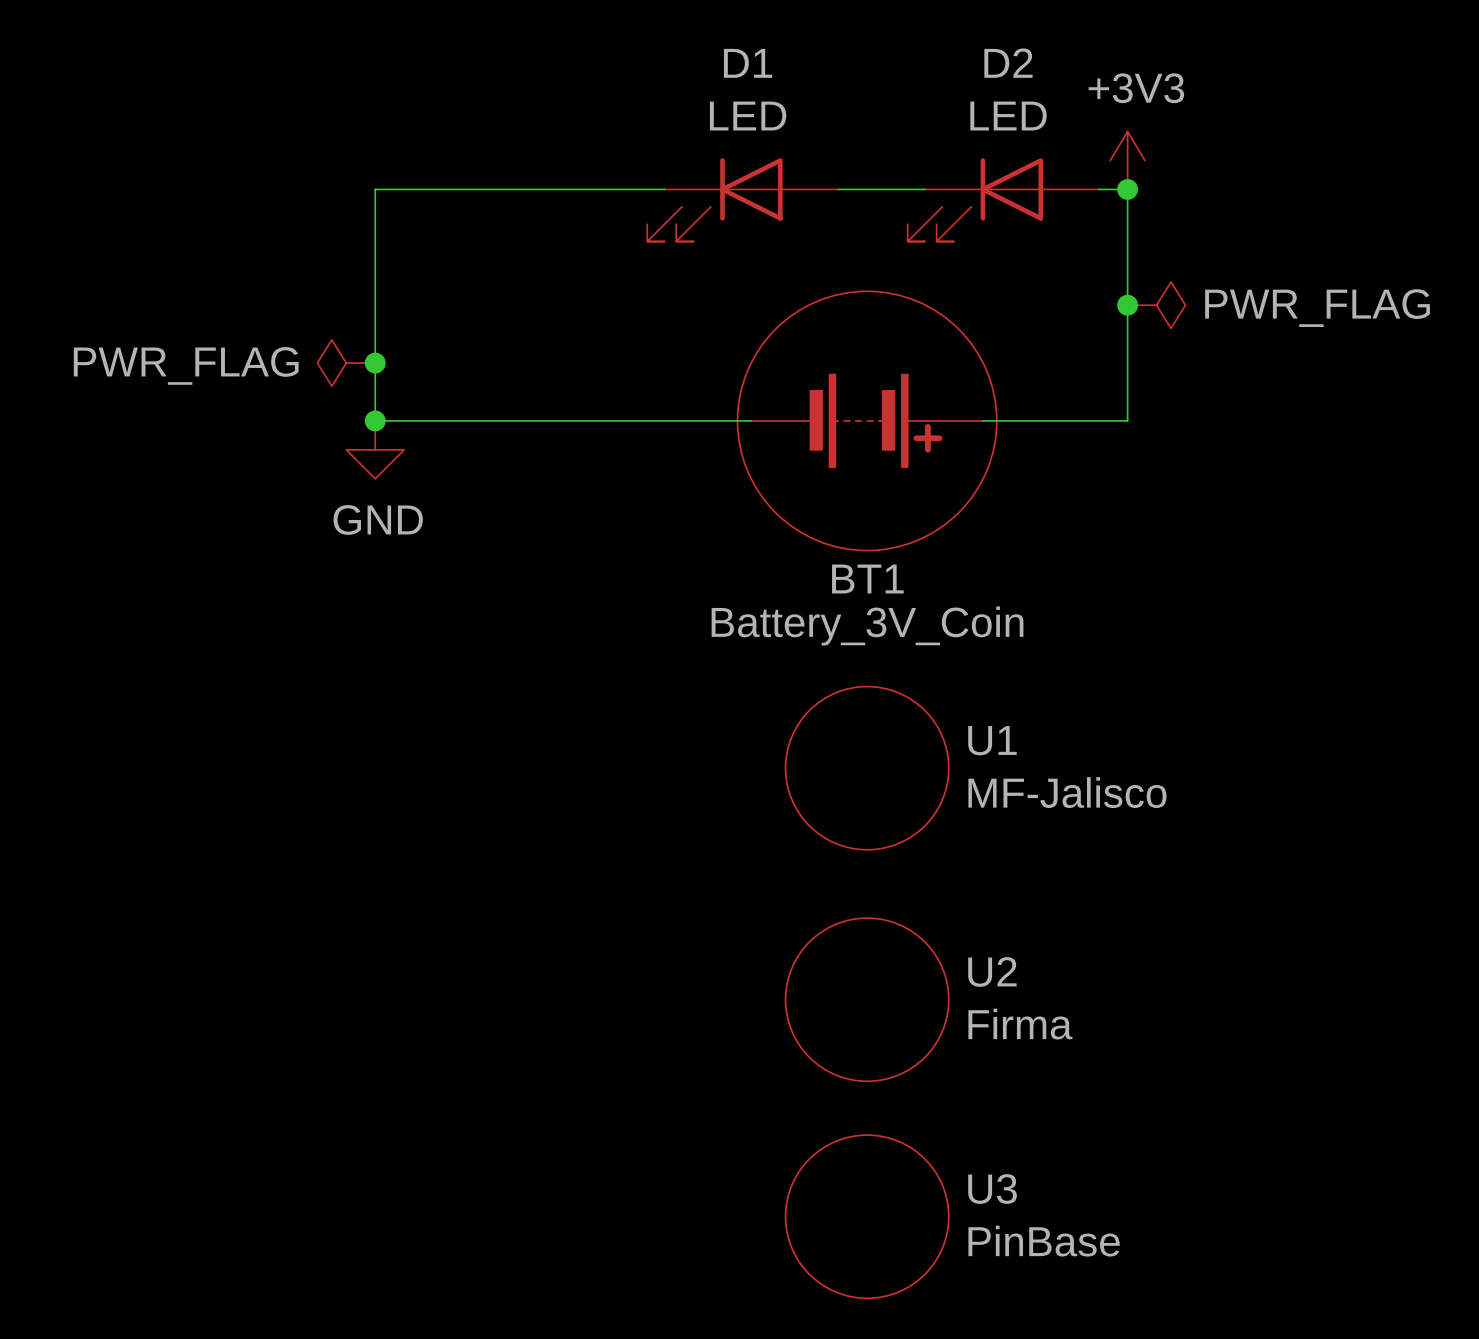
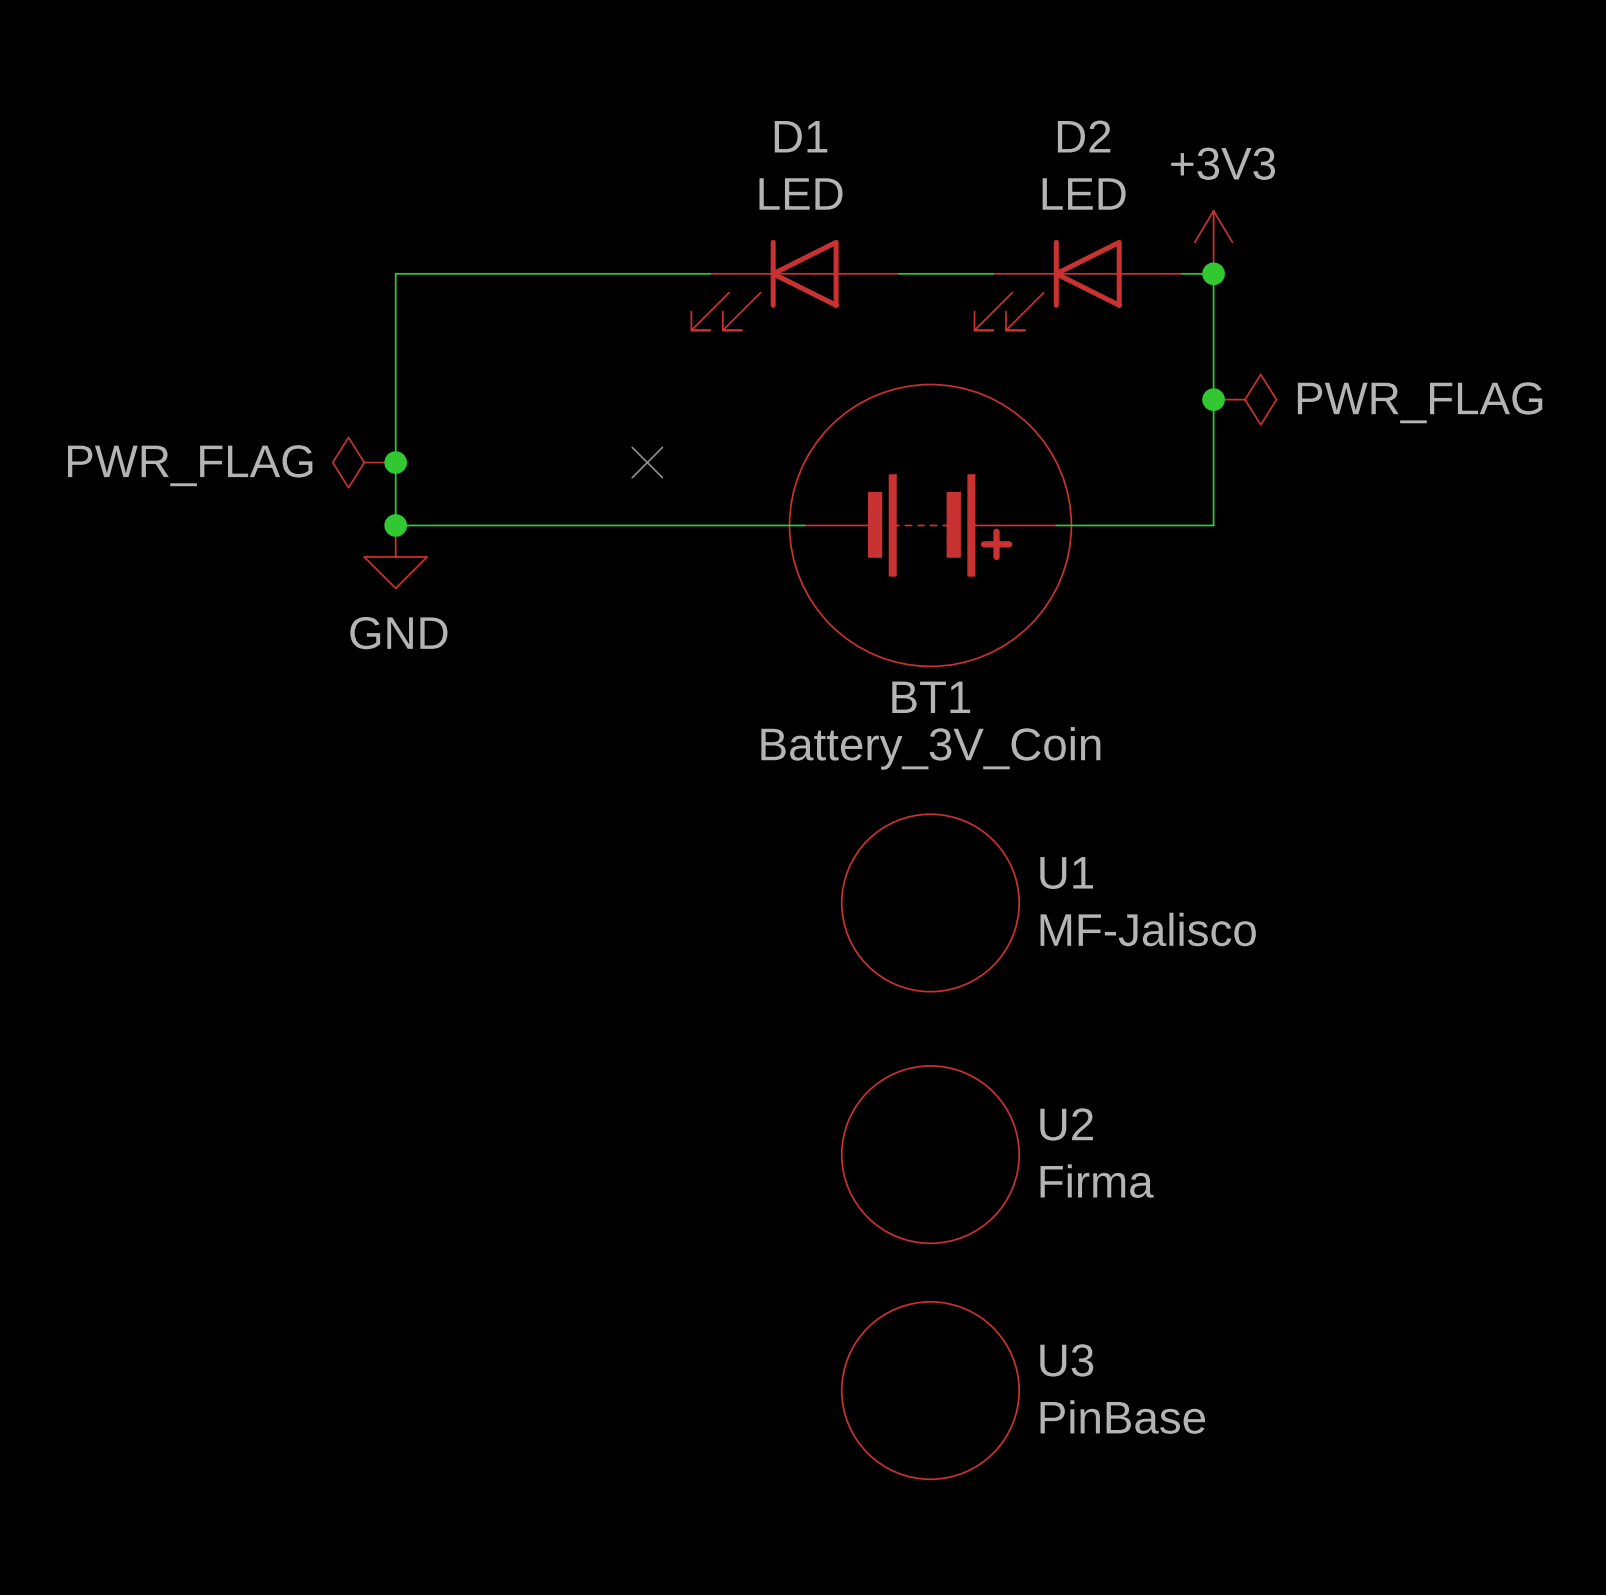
no-connect mark: none -> (647, 462)

